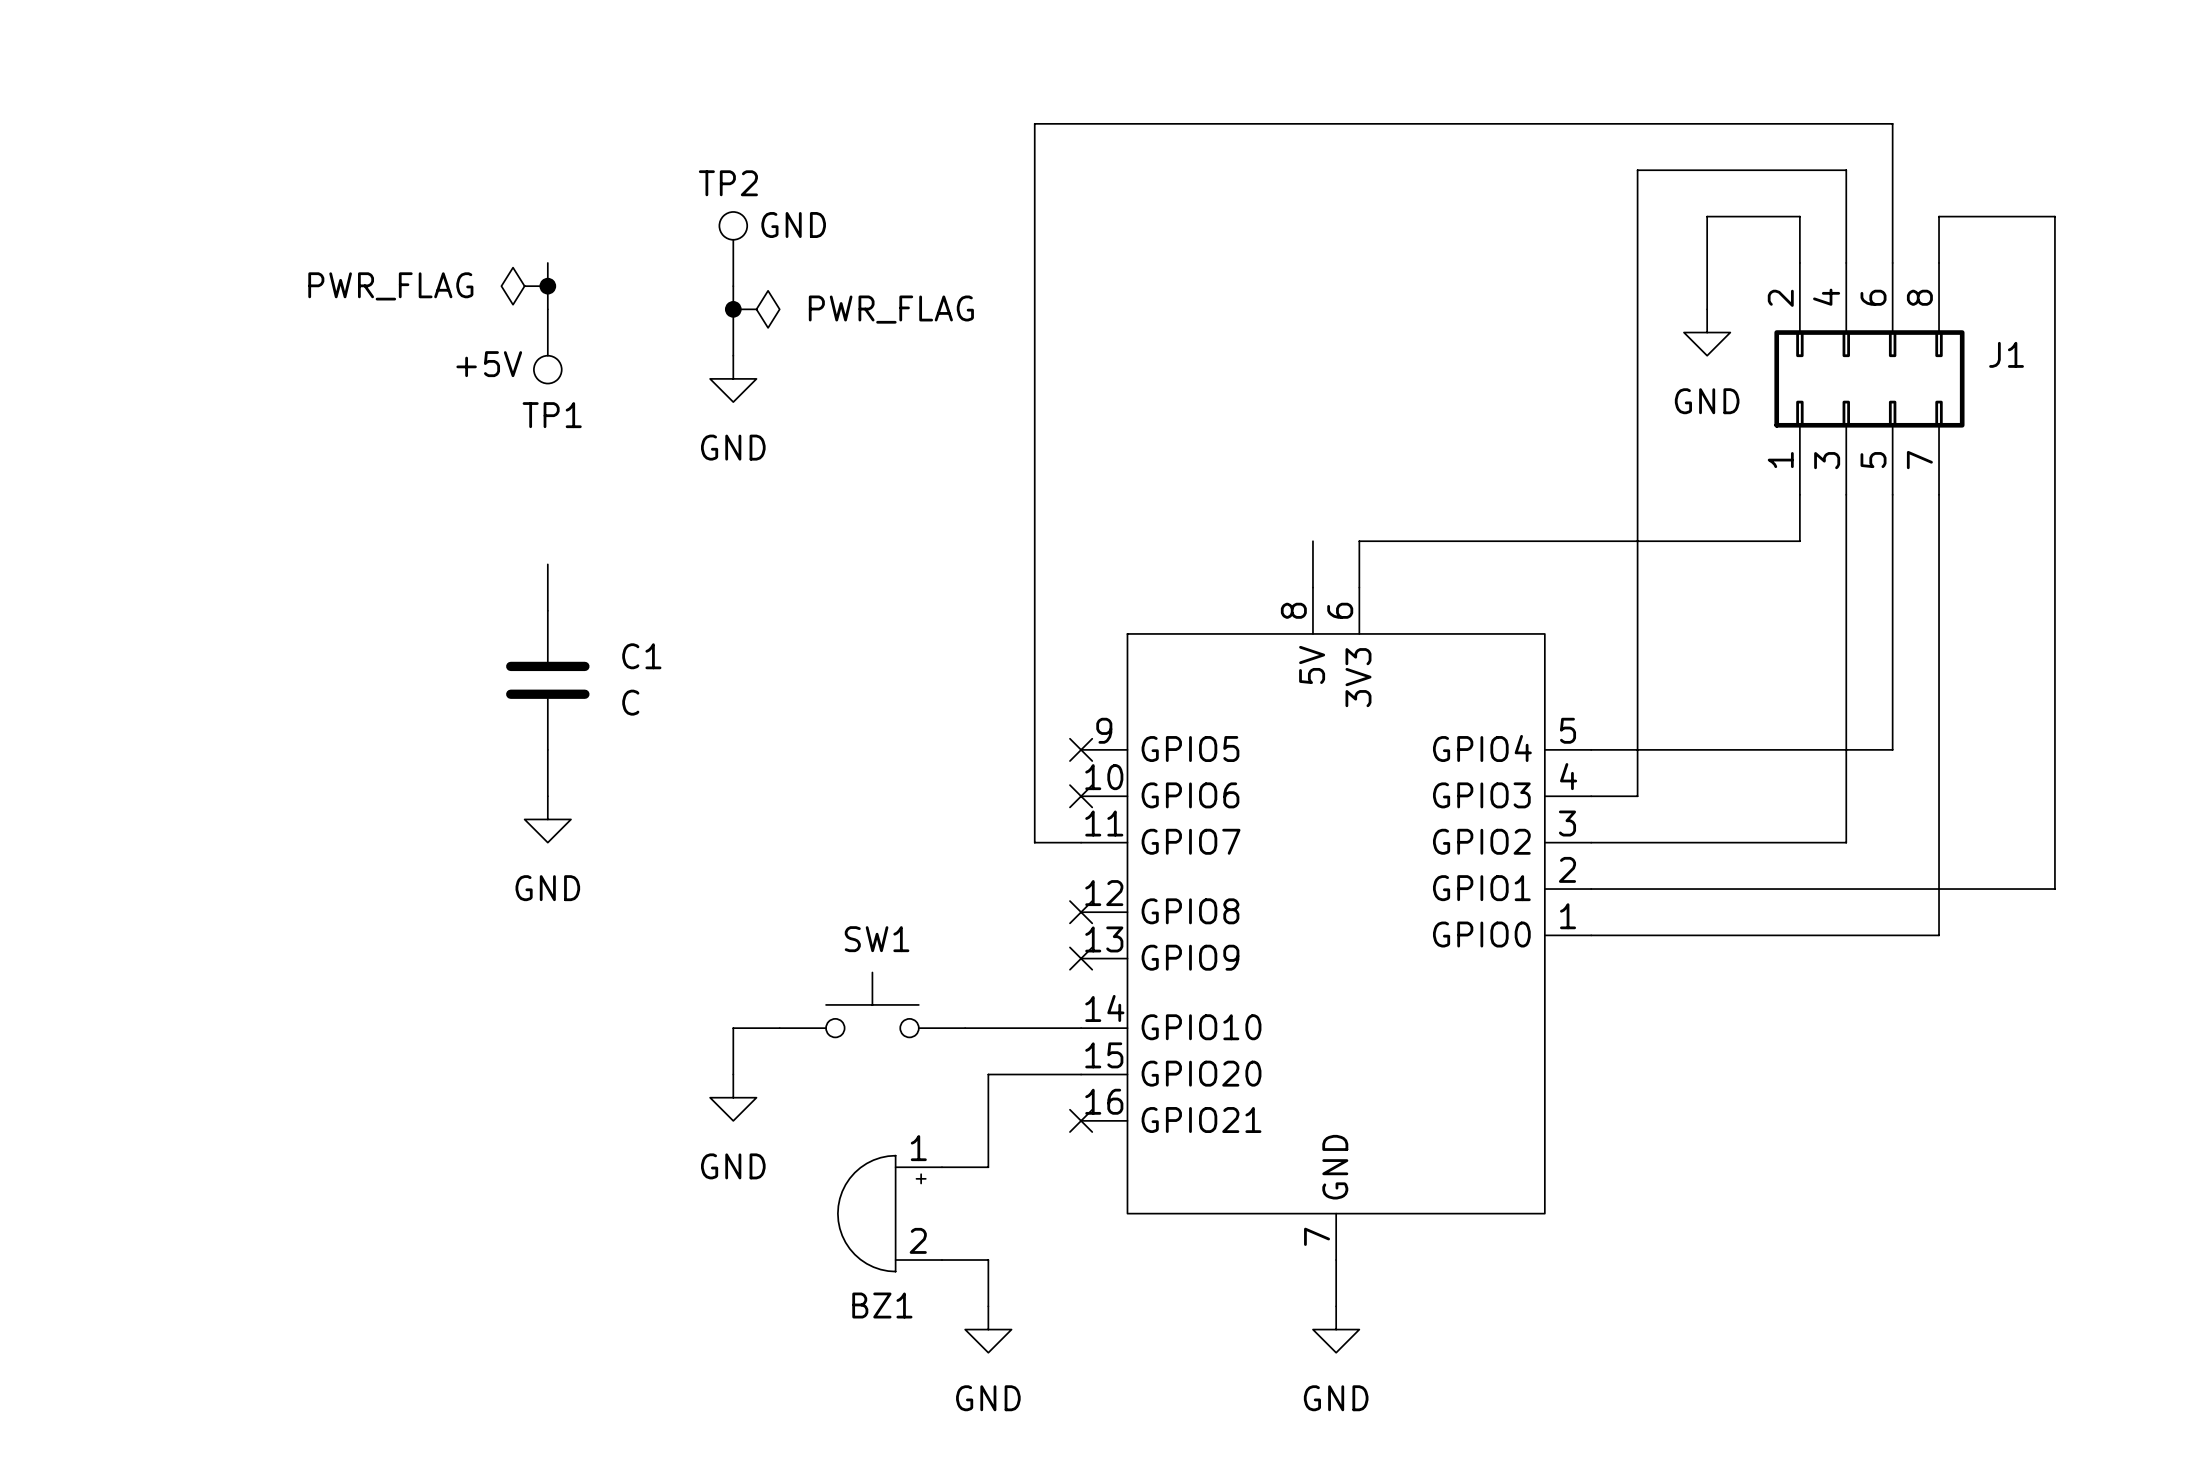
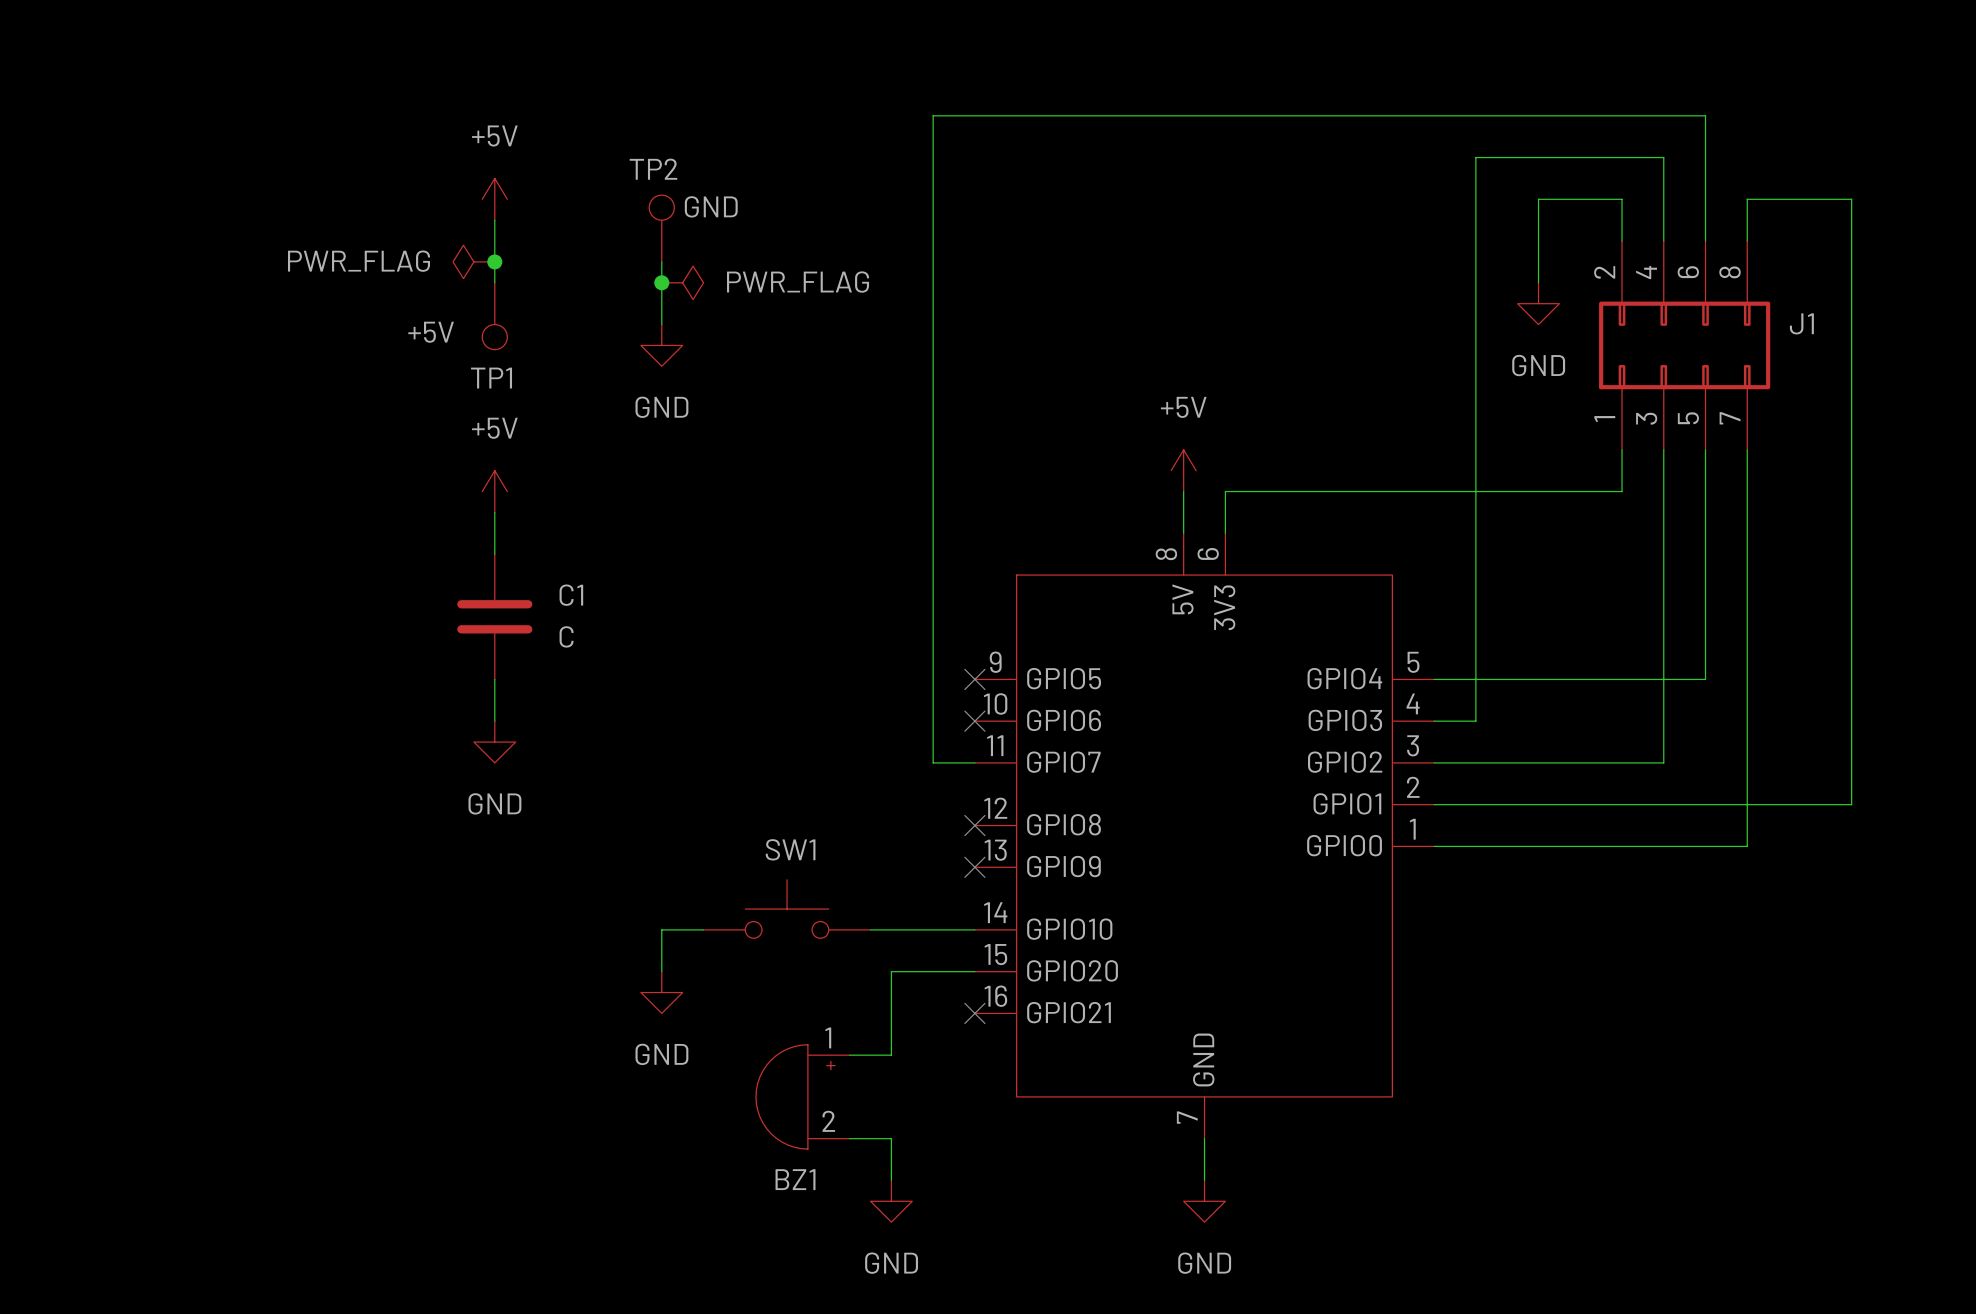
power symbol: none -> +5V (494, 199)
wire: none -> (494, 220) (494, 241)
power symbol: none -> +5V (1183, 470)
power symbol: none -> +5V (494, 491)

